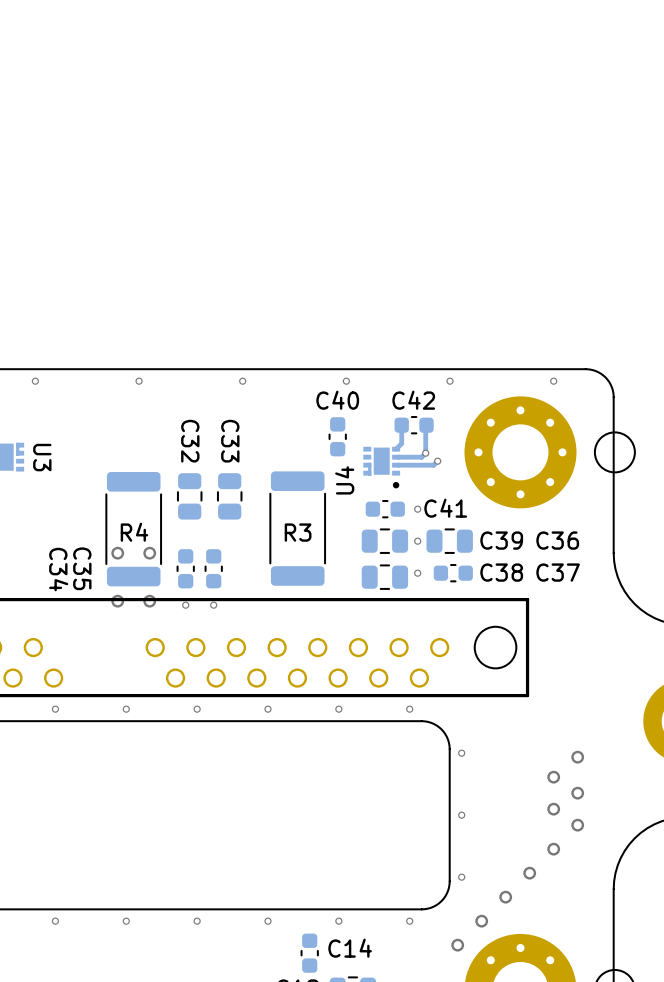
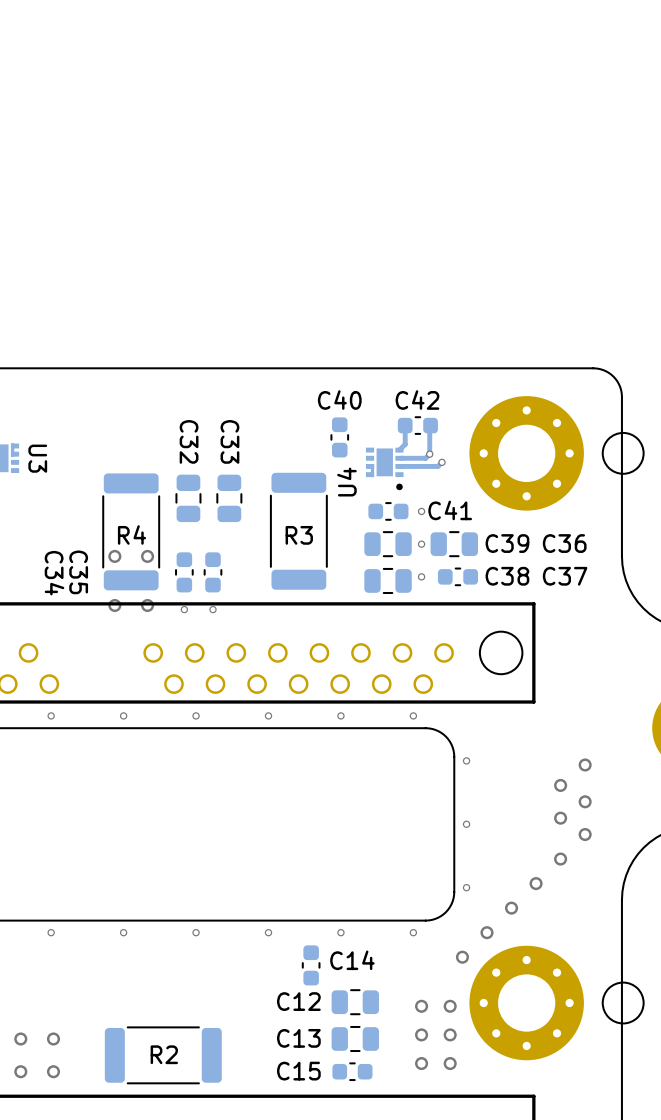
via: (35, 381) -> none
via: (139, 381) -> none
via: (242, 381) -> none
via: (346, 381) -> none
via: (450, 381) -> none
via: (553, 381) -> none

